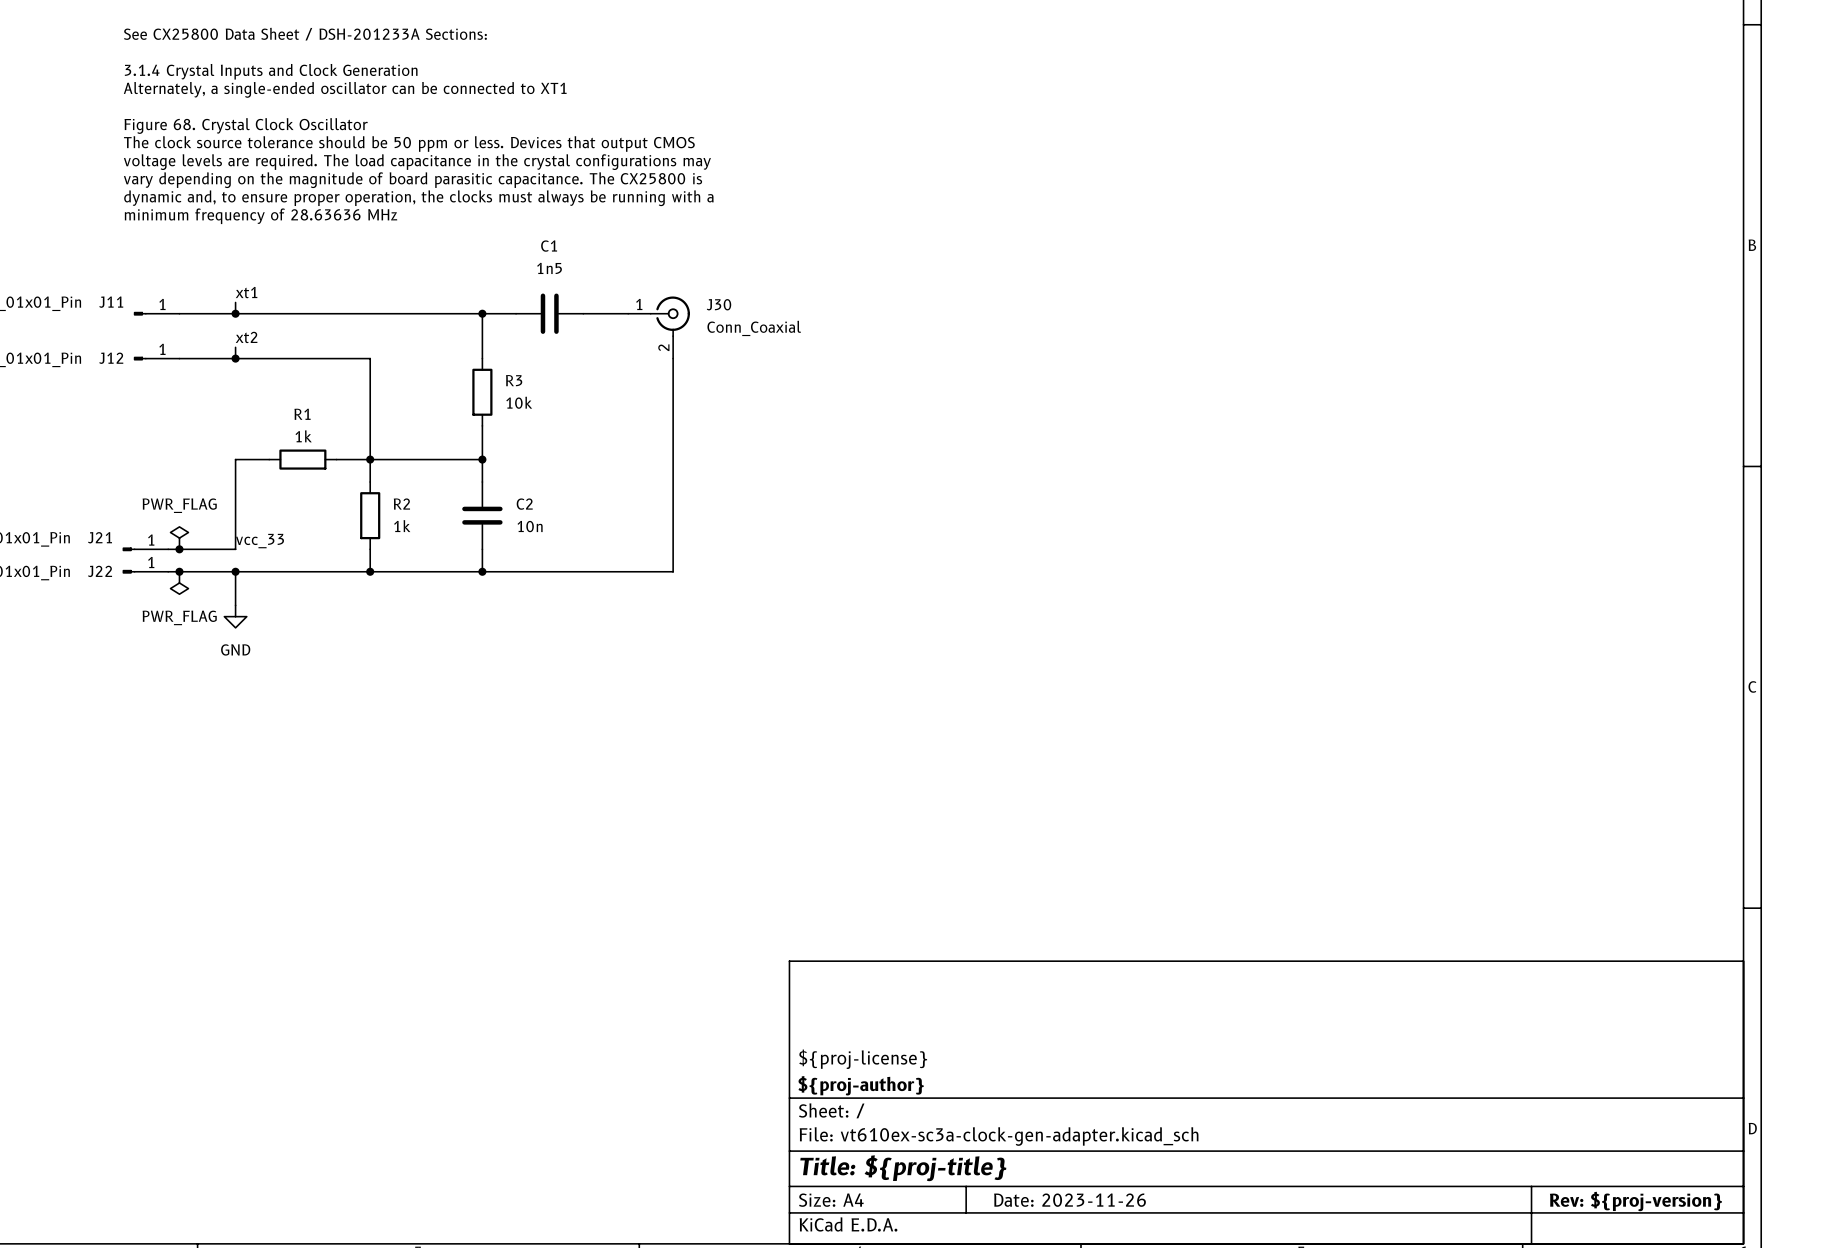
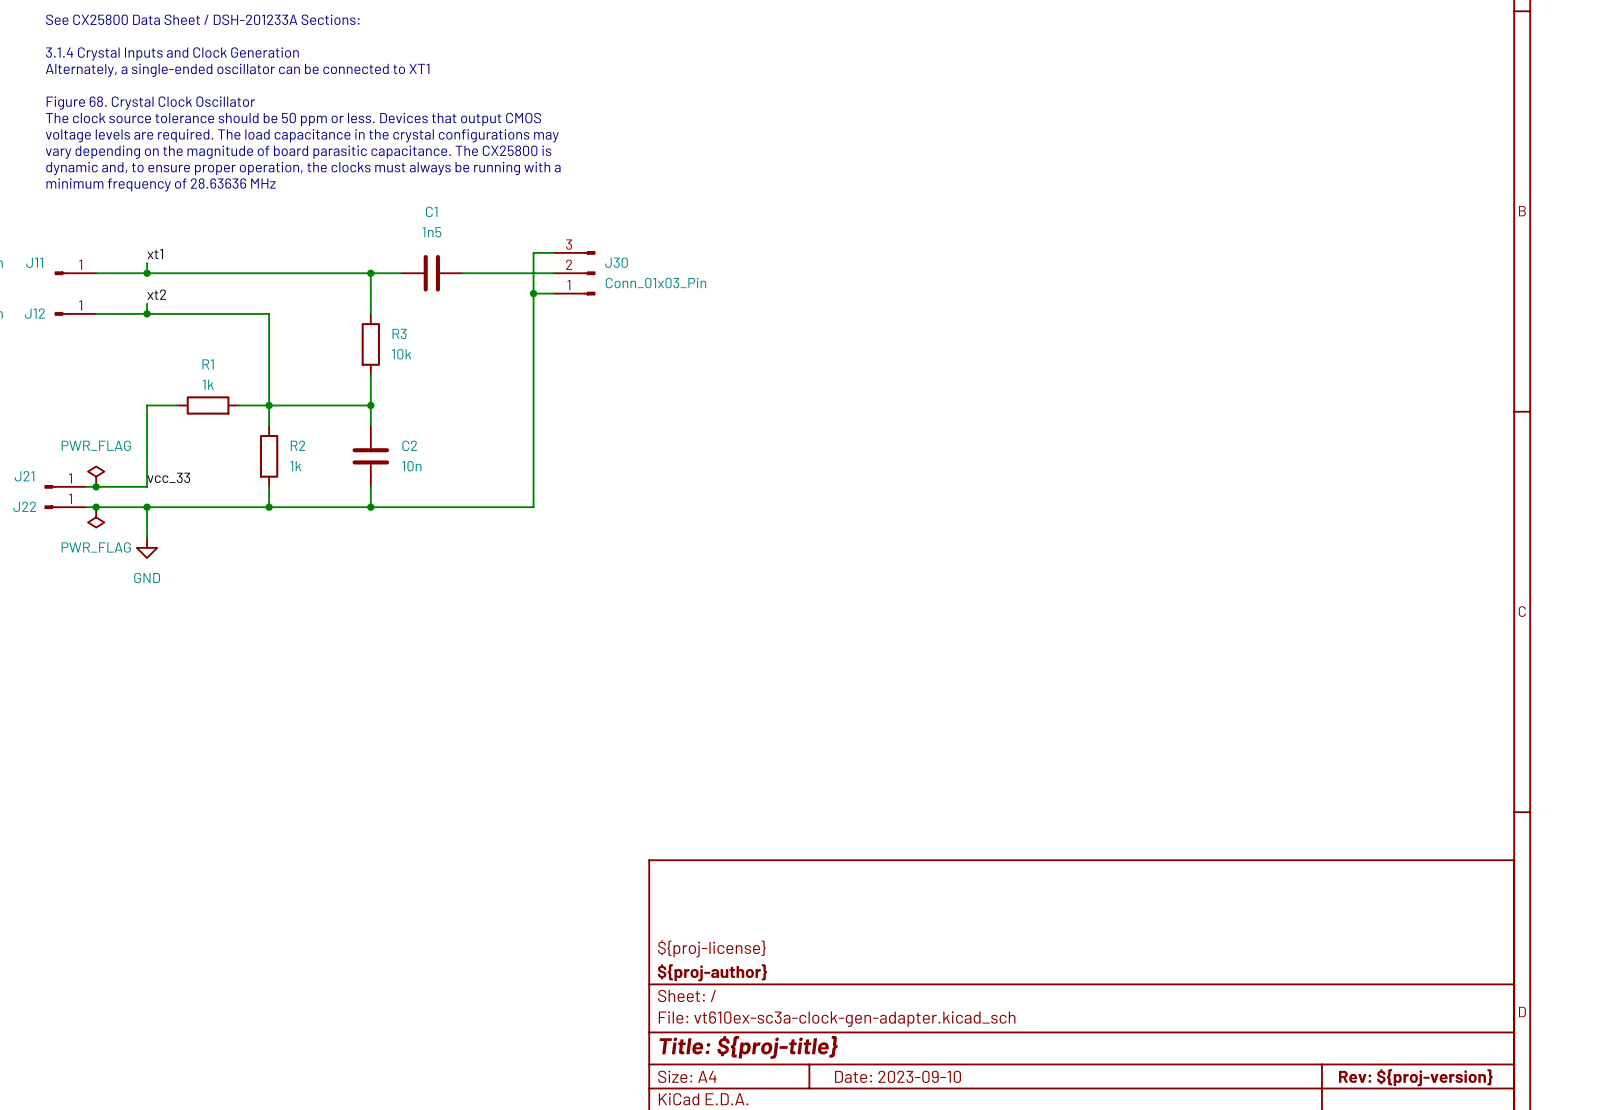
J30 symbol: [628, 296, 690, 359] -> [553, 251, 596, 296]
J30 name position: J30 (718, 304) -> J30 (616, 262)
J30 value: Conn_Coaxial (754, 328) -> Conn_01x03_Pin (656, 283)
wire: none -> (533, 293) (553, 293)
junction: none -> (533, 293)
wire: (673, 358) (673, 571) (661, 571) -> (553, 252) (533, 252) (533, 507)
title block: Date: 2023-11-26 (1070, 1200) -> Date: 2023-09-10 (898, 1076)

